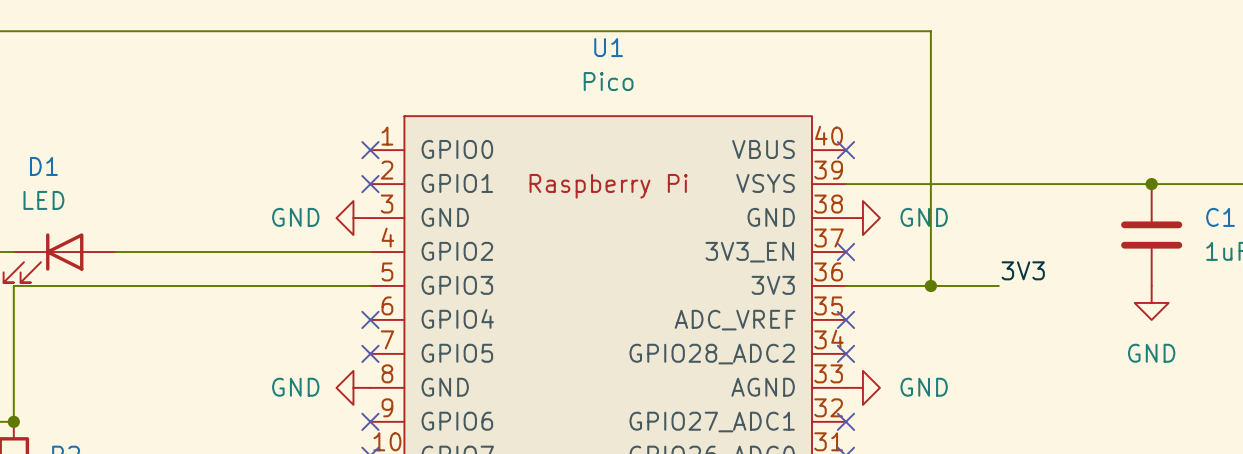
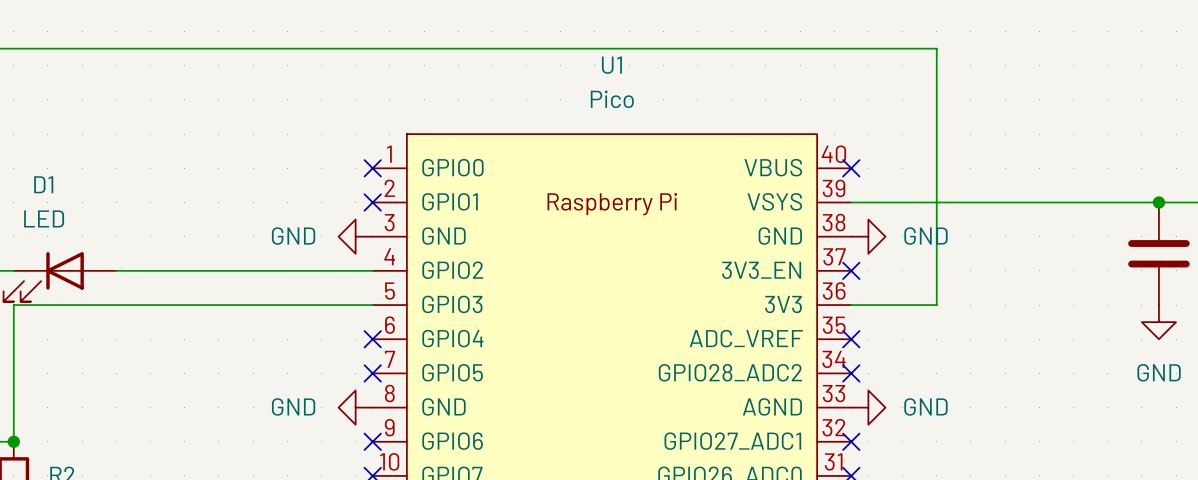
label: 3V3 (1023, 270) -> none
wire: (930, 285) (998, 285) -> none
junction: (930, 285) -> none

